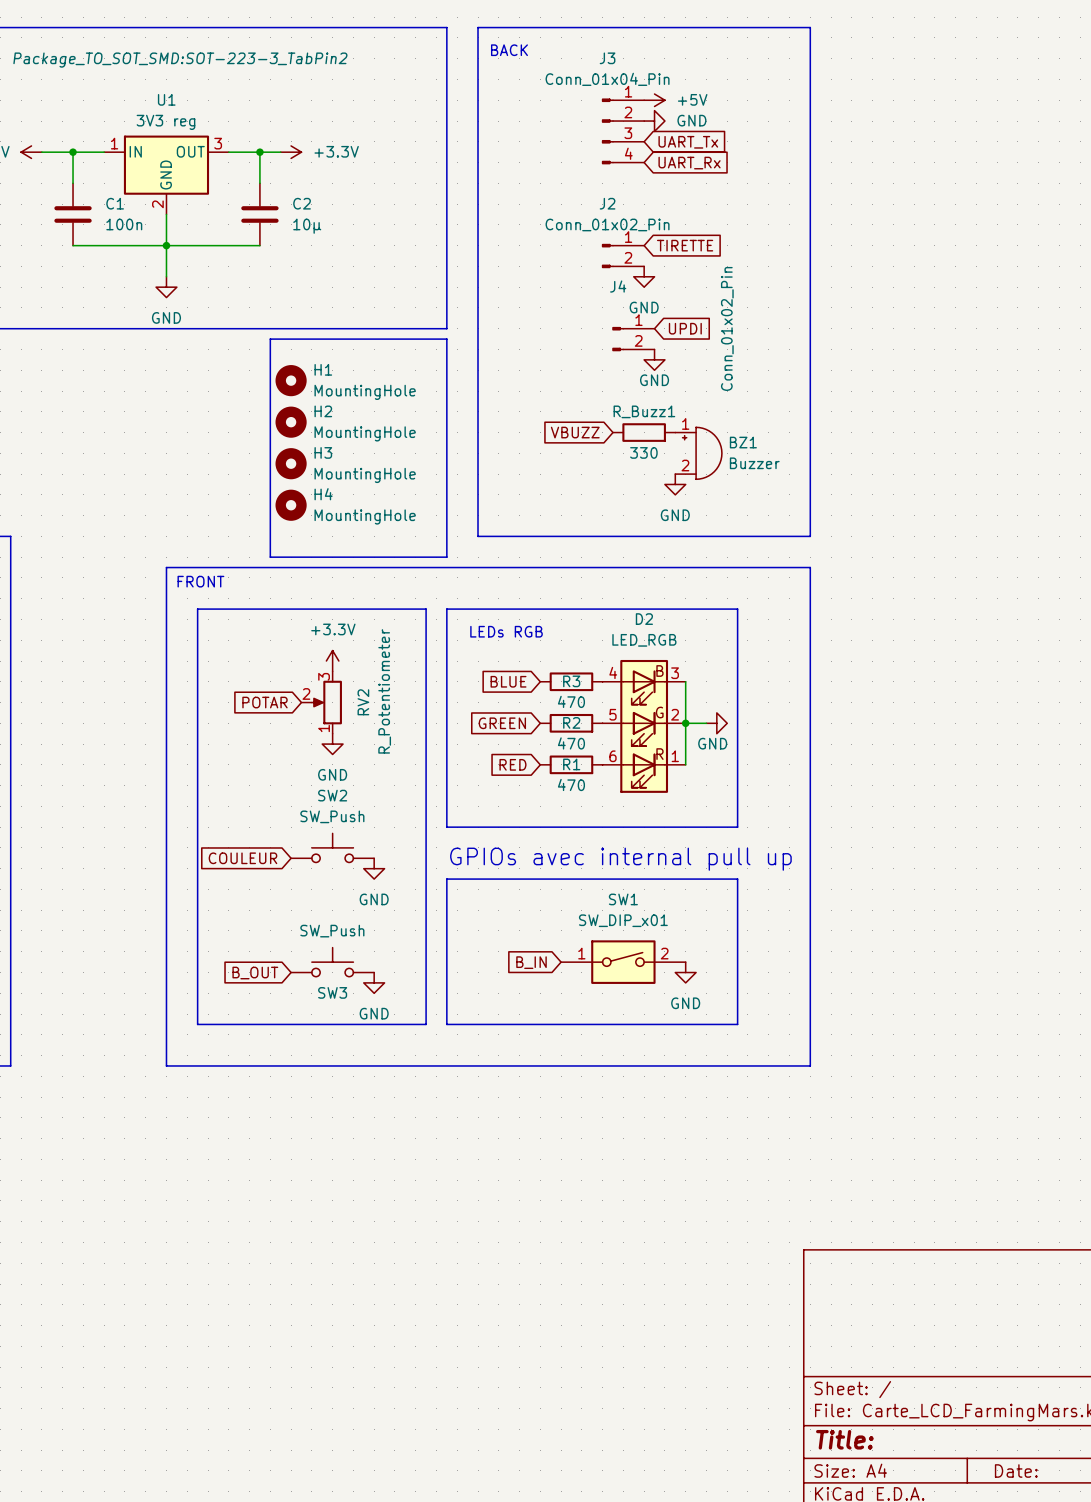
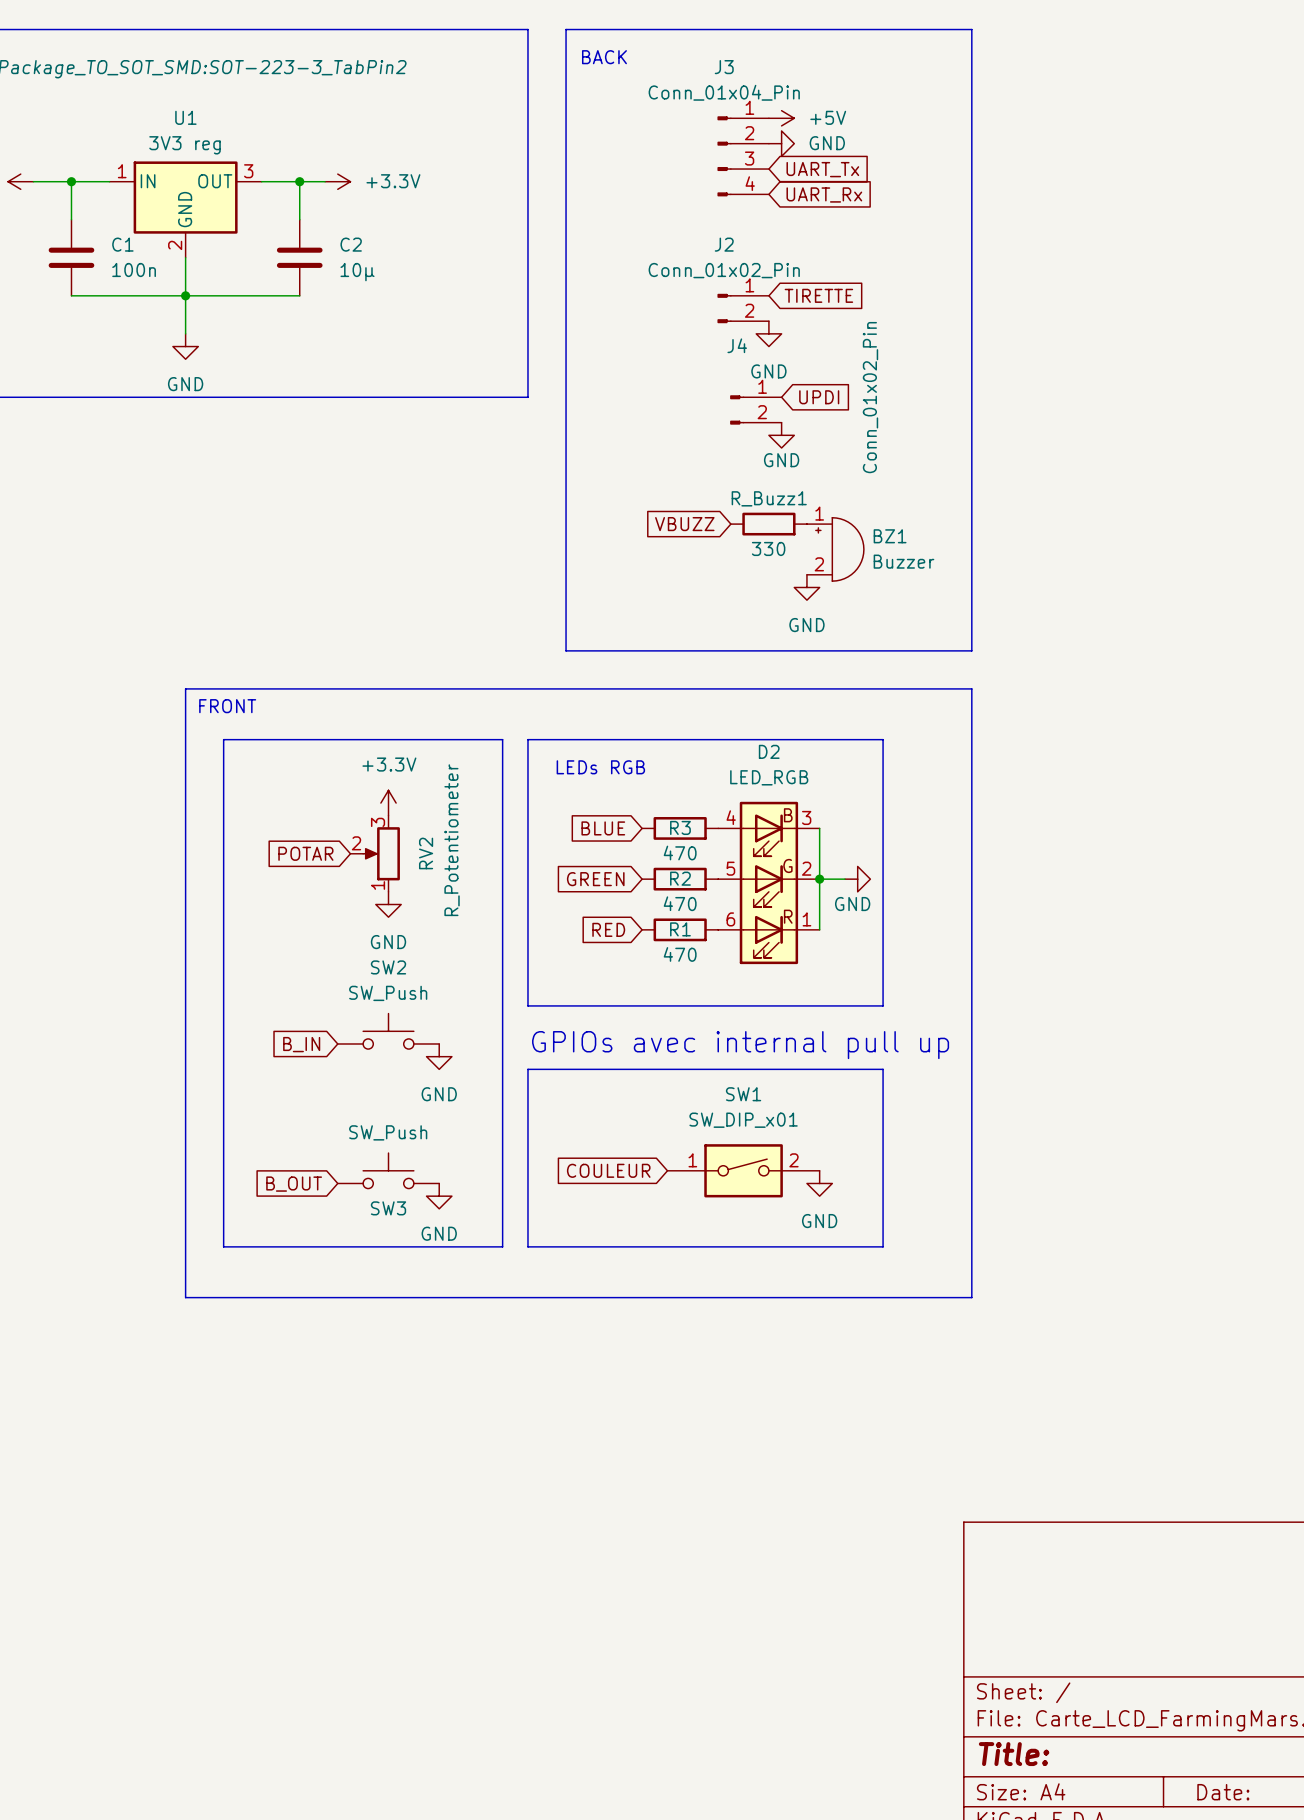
line: (270, 339) (446, 339) (446, 557) (270, 557) (270, 339) -> none
H1: MountingHole (291, 380) -> none
H2: MountingHole (291, 422) -> none
H3: MountingHole (291, 463) -> none
H4: MountingHole (291, 505) -> none
global label: COULEUR (242, 858) -> B_IN (301, 1044)
global label: B_IN (531, 962) -> COULEUR (608, 1170)

